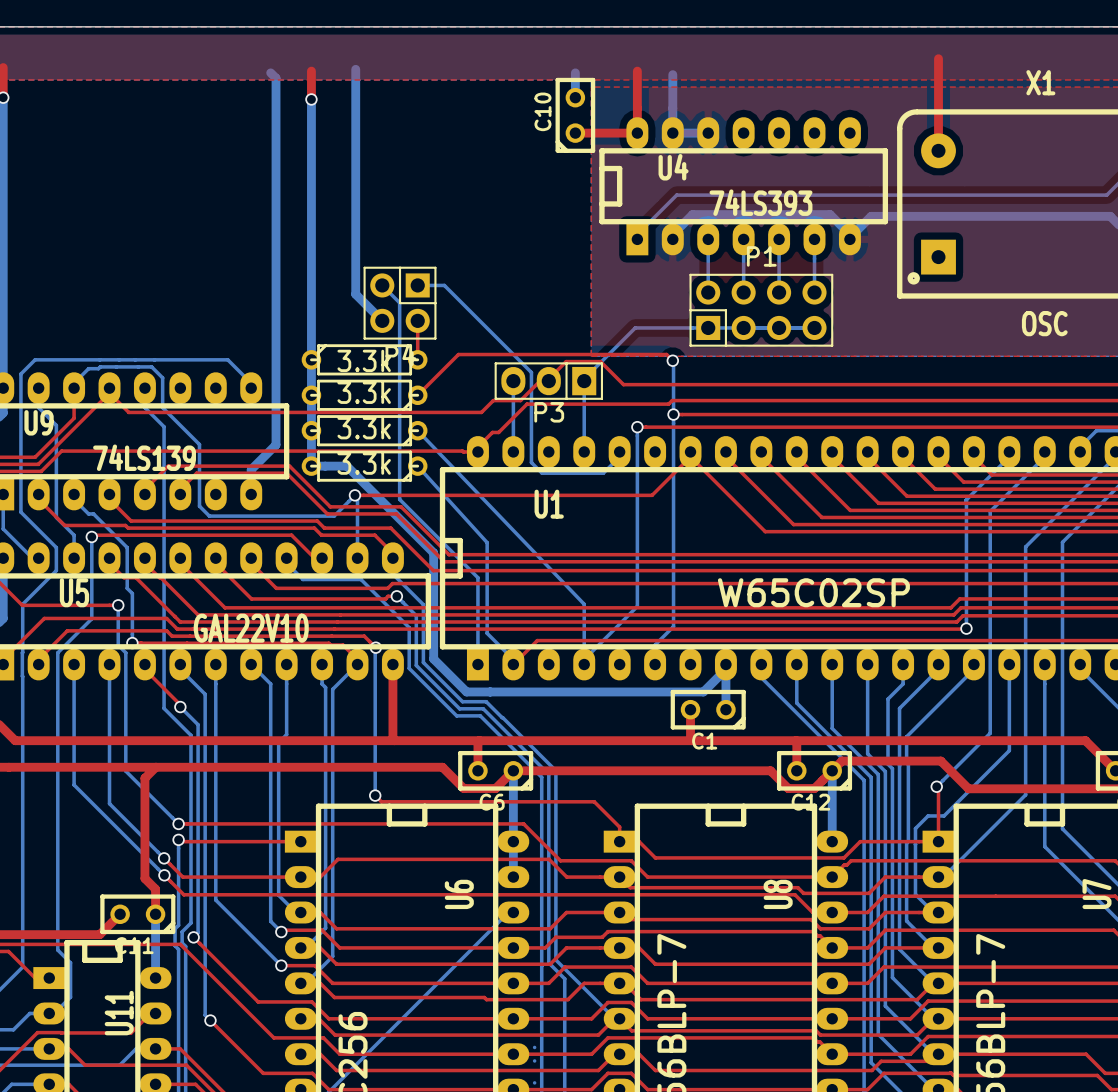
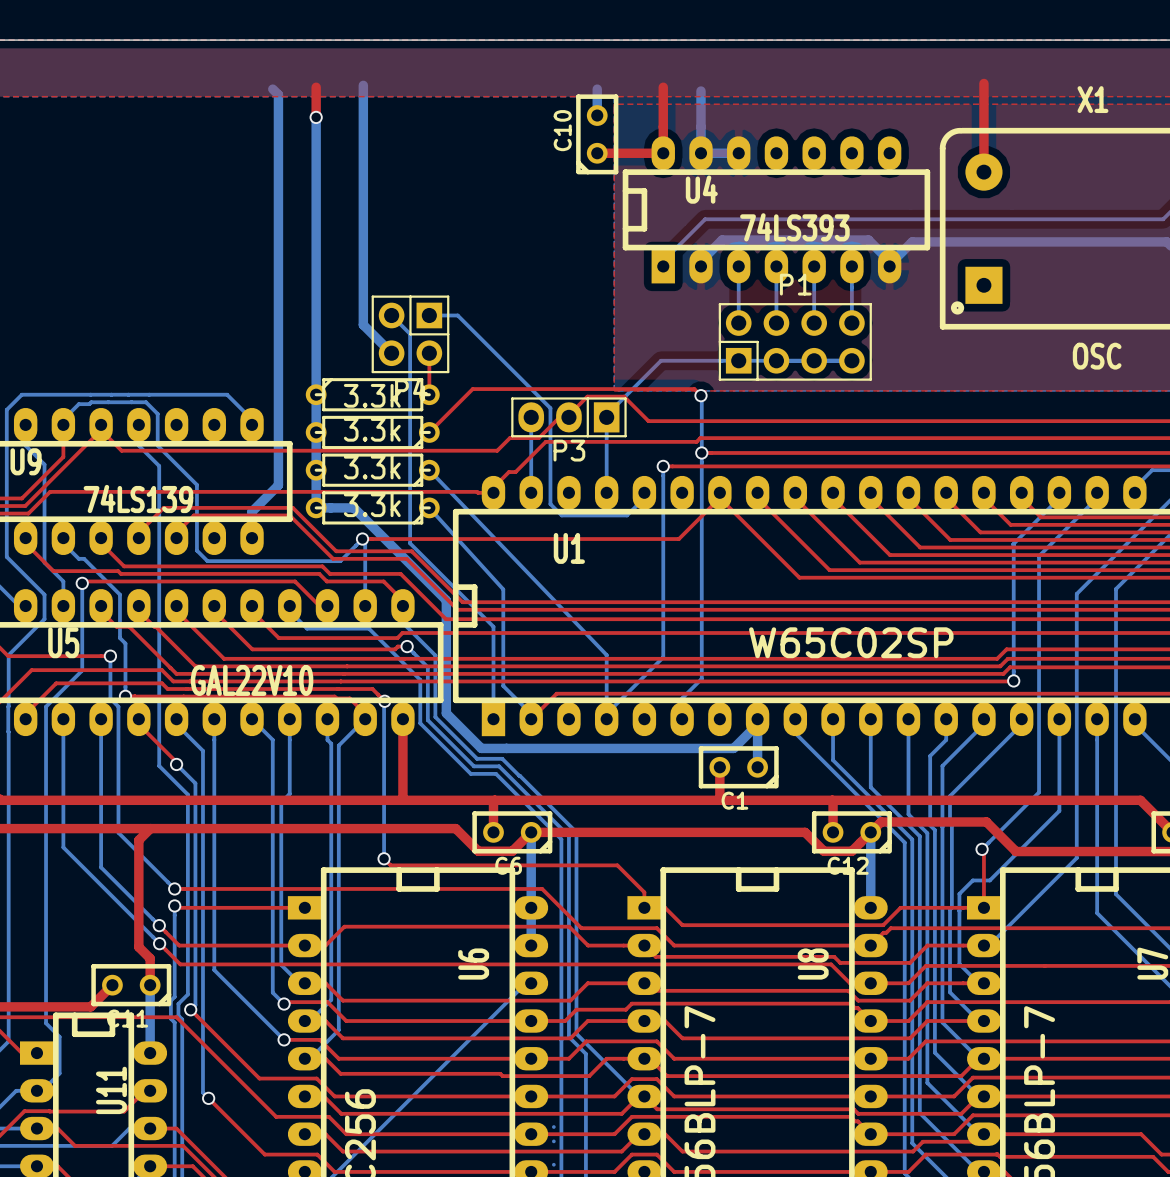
top track: (938, 58) (938, 67) -> none

